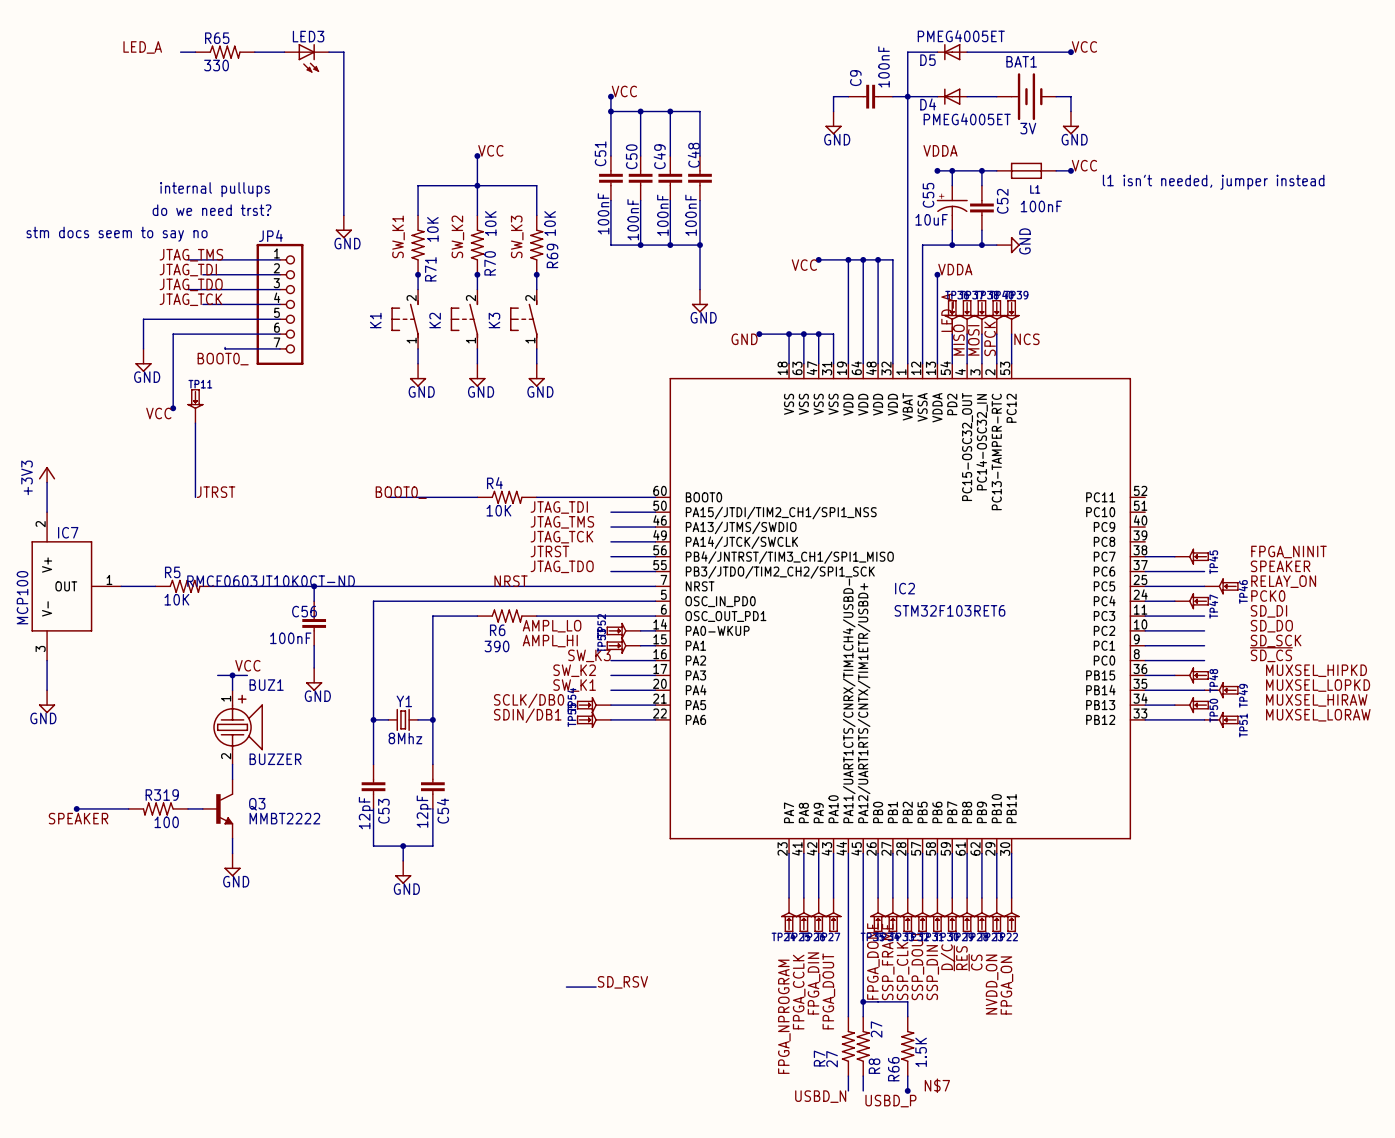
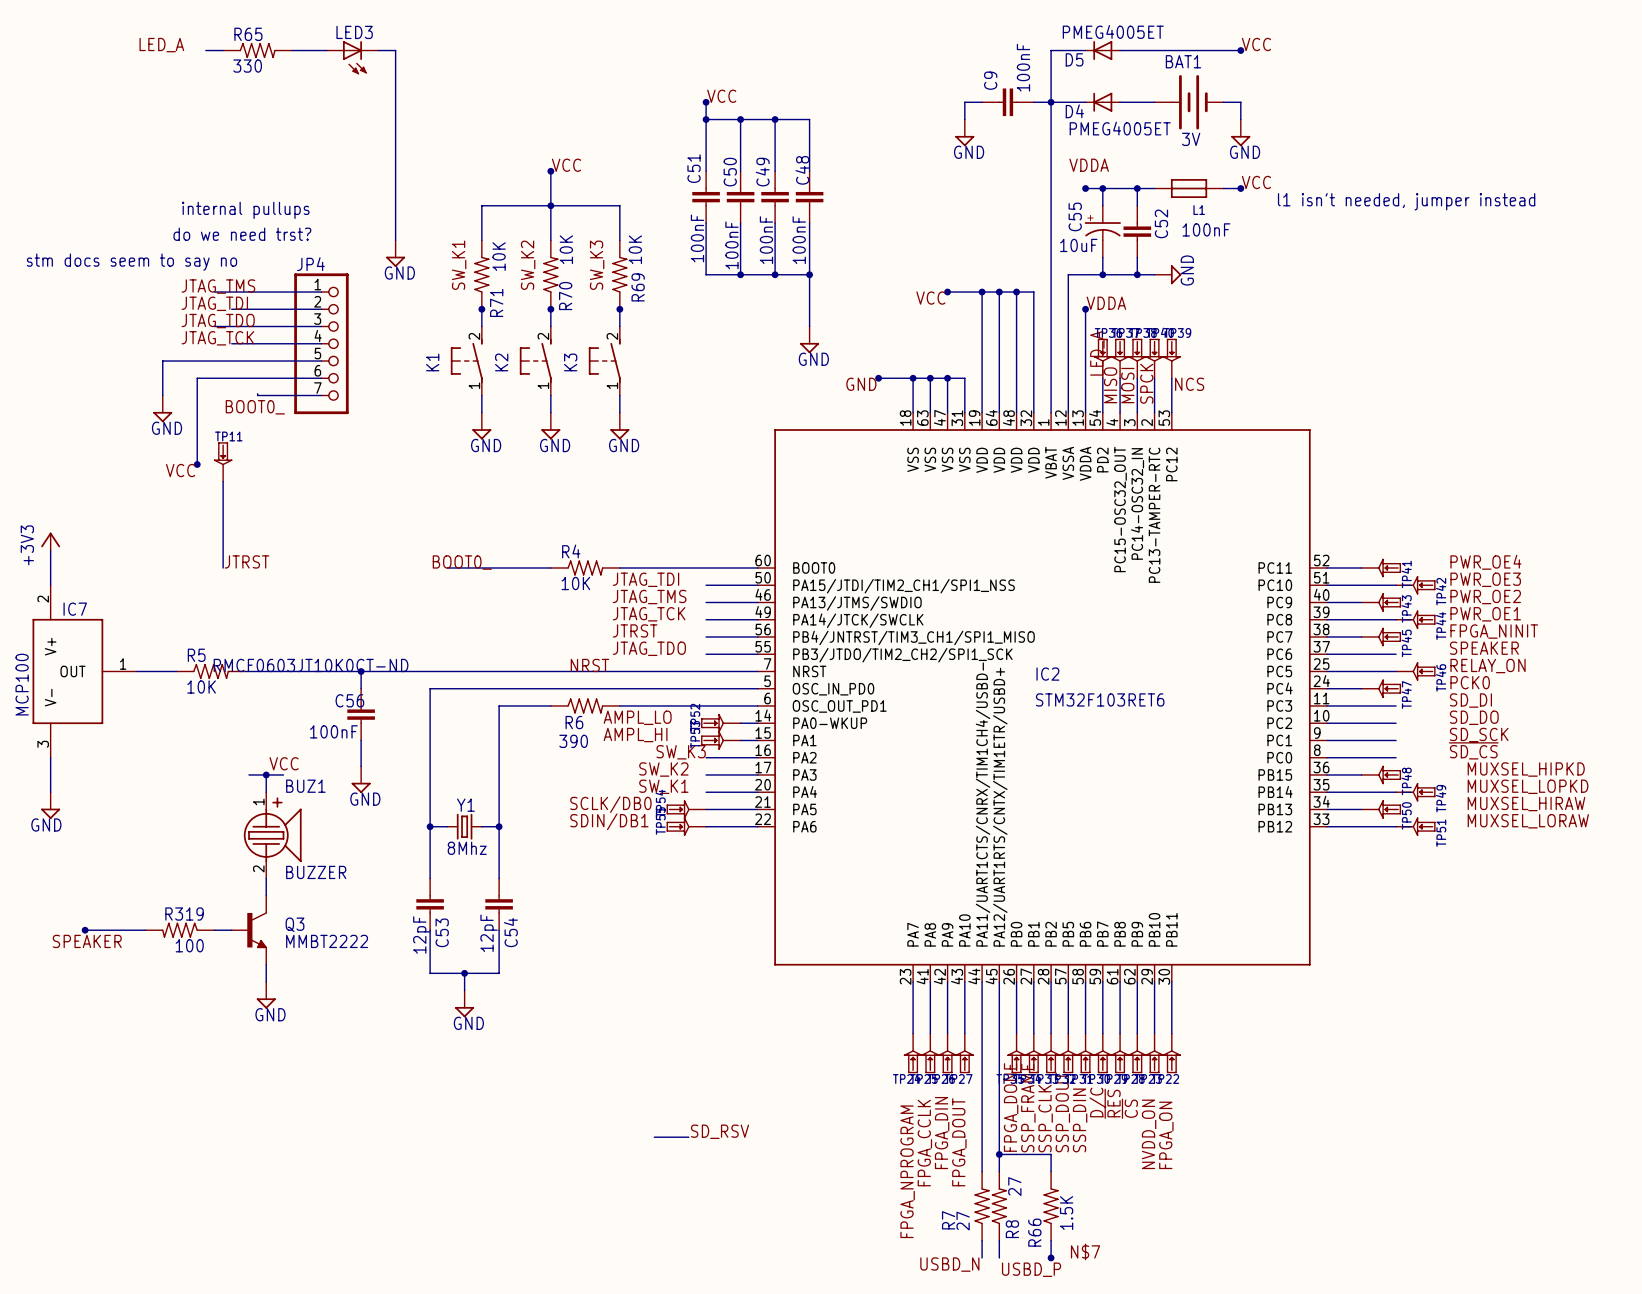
label: none -> PWR_OE4 (1485, 562)
wire: none -> (1327, 567) (1361, 567)
TP41: none -> (1381, 567)
label: none -> PWR_OE3 (1485, 579)
wire: none -> (1327, 585) (1396, 585)
TP42: none -> (1415, 585)
label: none -> PWR_OE2 (1485, 597)
wire: none -> (1327, 602) (1361, 602)
TP43: none -> (1381, 602)
label: none -> PWR_OE1 (1485, 614)
wire: none -> (1327, 619) (1396, 619)
TP44: none -> (1415, 619)

